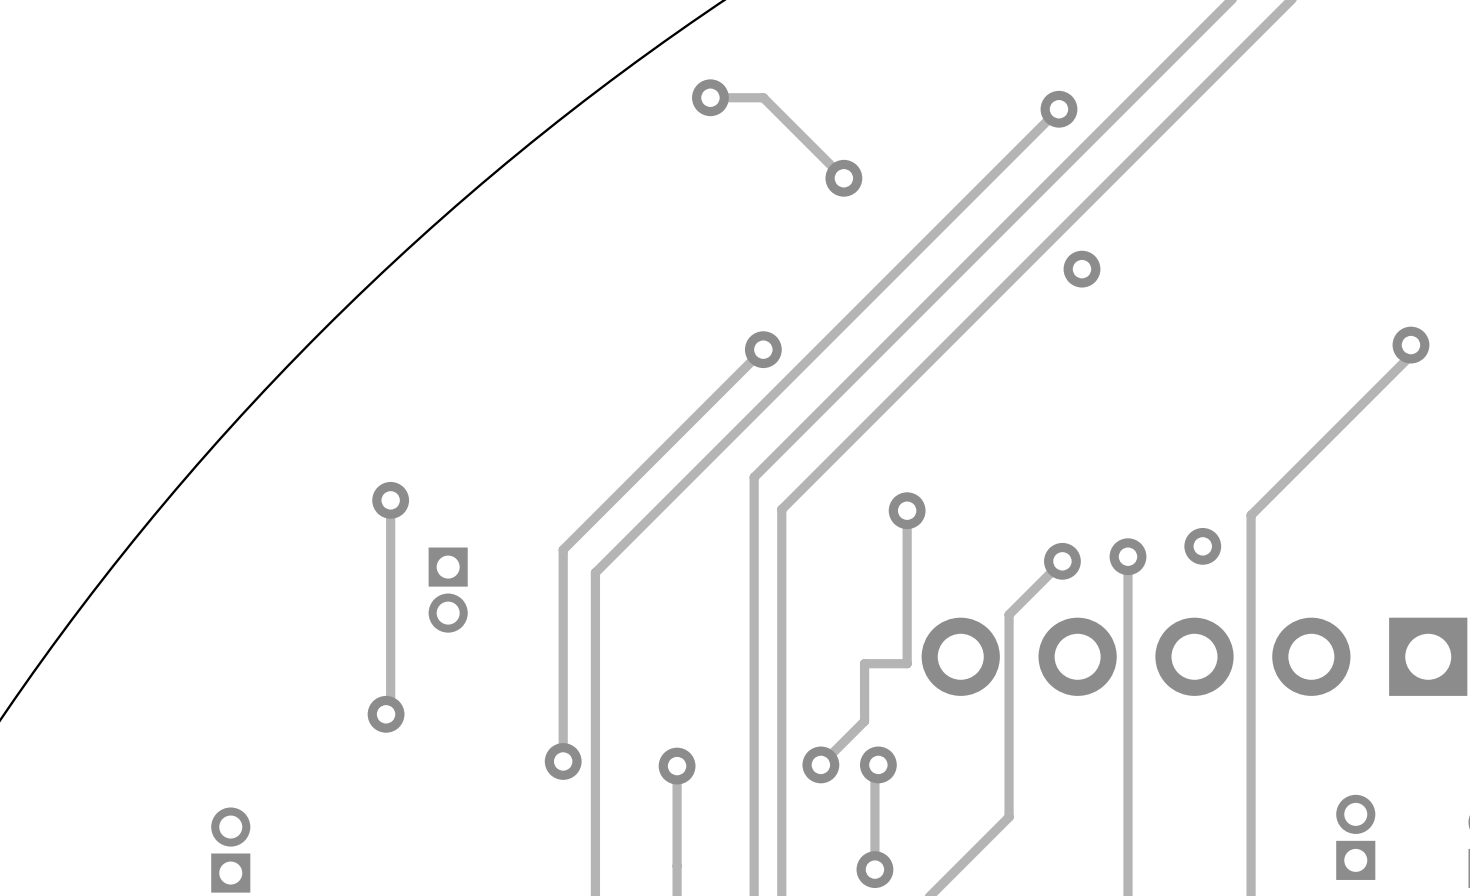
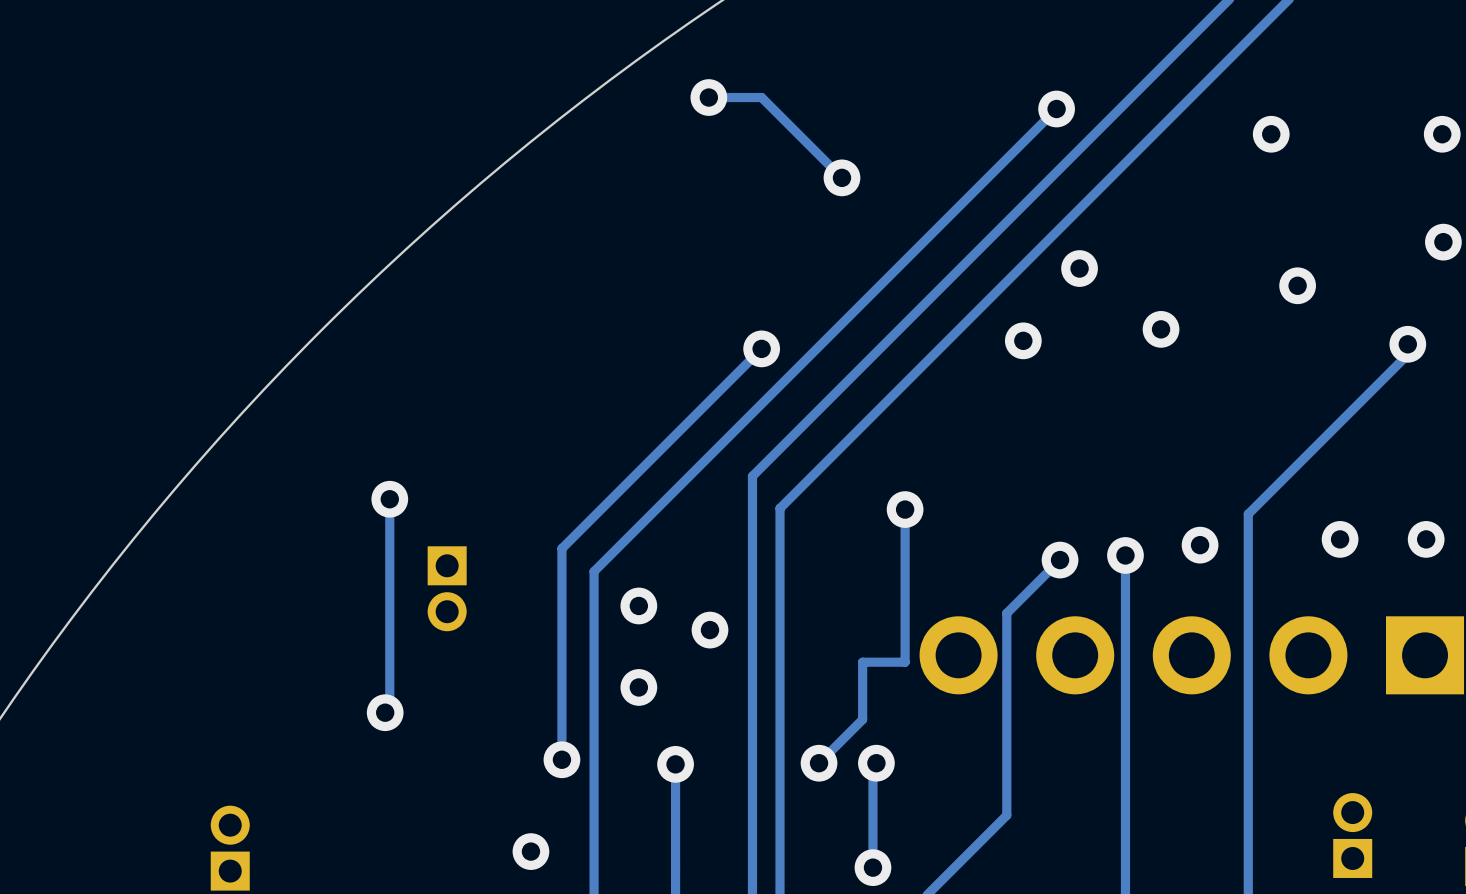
via: none -> (1271, 134)
via: none -> (1442, 134)
via: none -> (1443, 242)
via: none -> (1297, 285)
via: none -> (1161, 329)
via: none -> (1023, 340)
via: none -> (1340, 539)
via: none -> (1426, 539)
via: none -> (638, 605)
via: none -> (709, 630)
via: none -> (638, 687)
via: none -> (530, 851)

